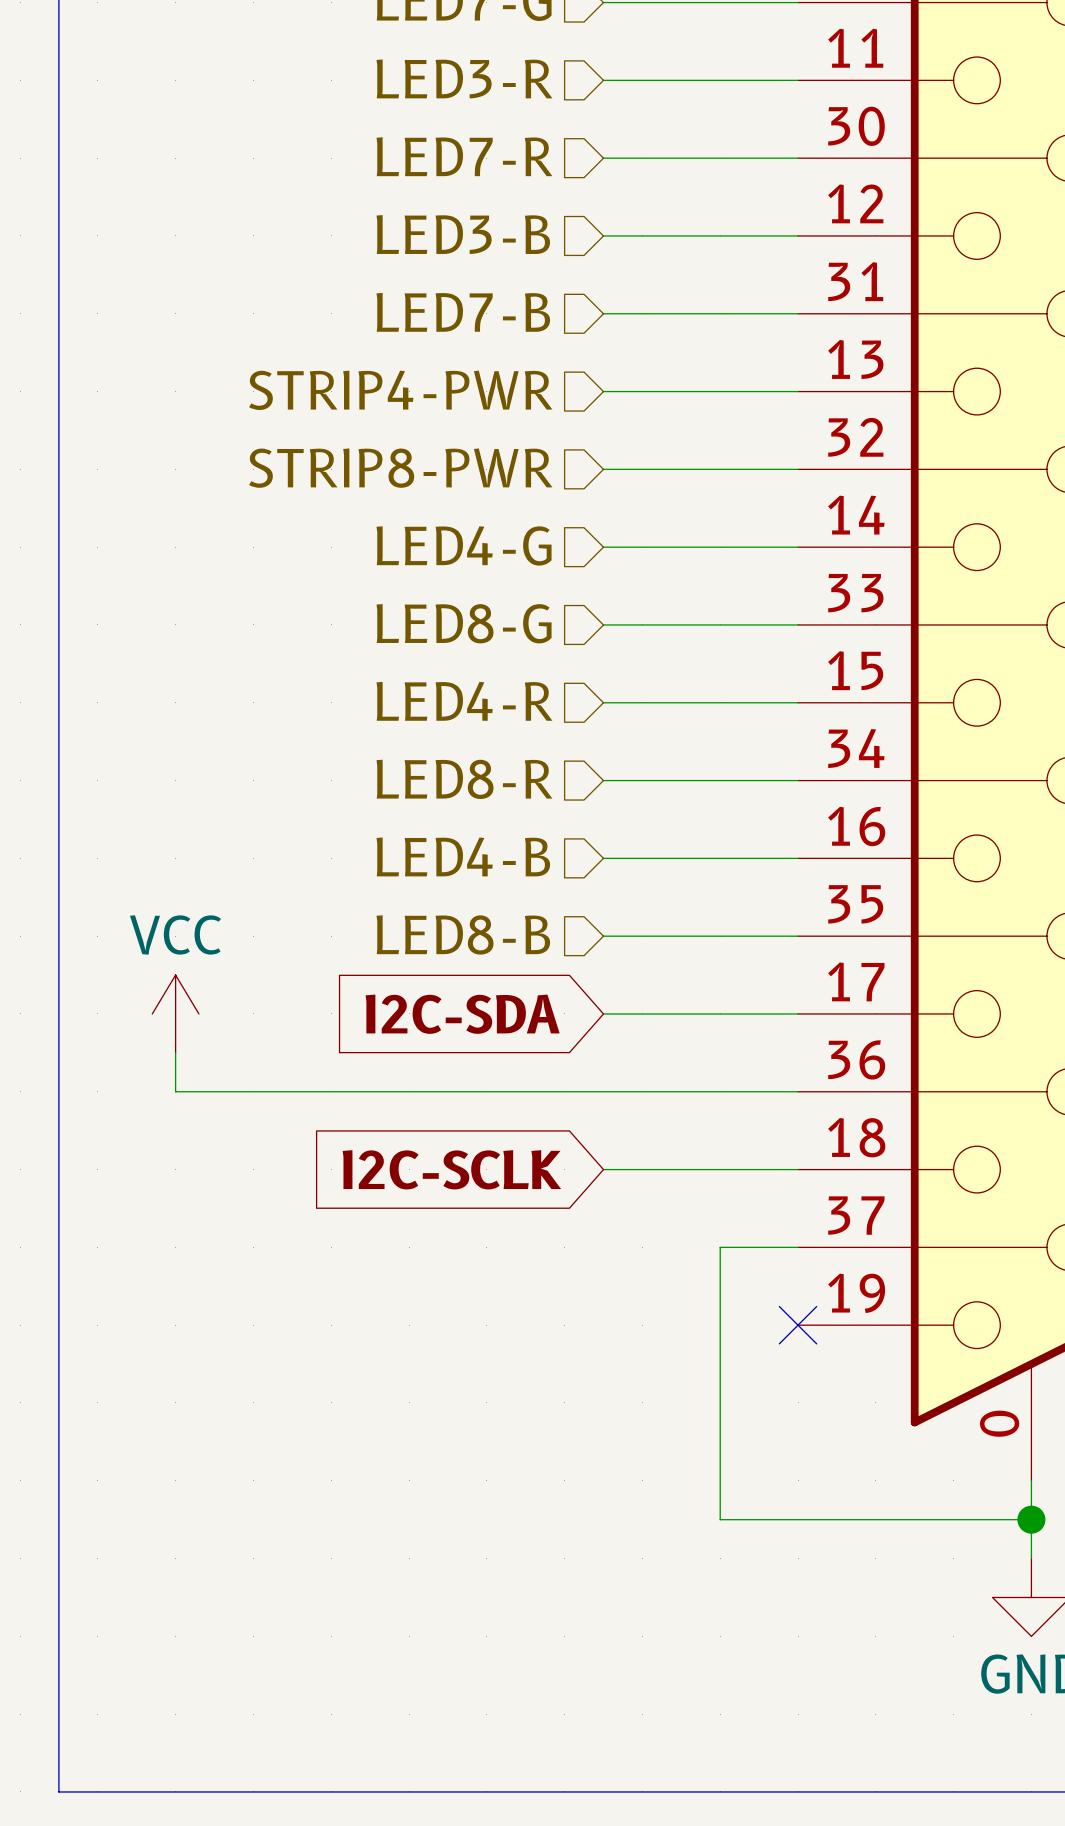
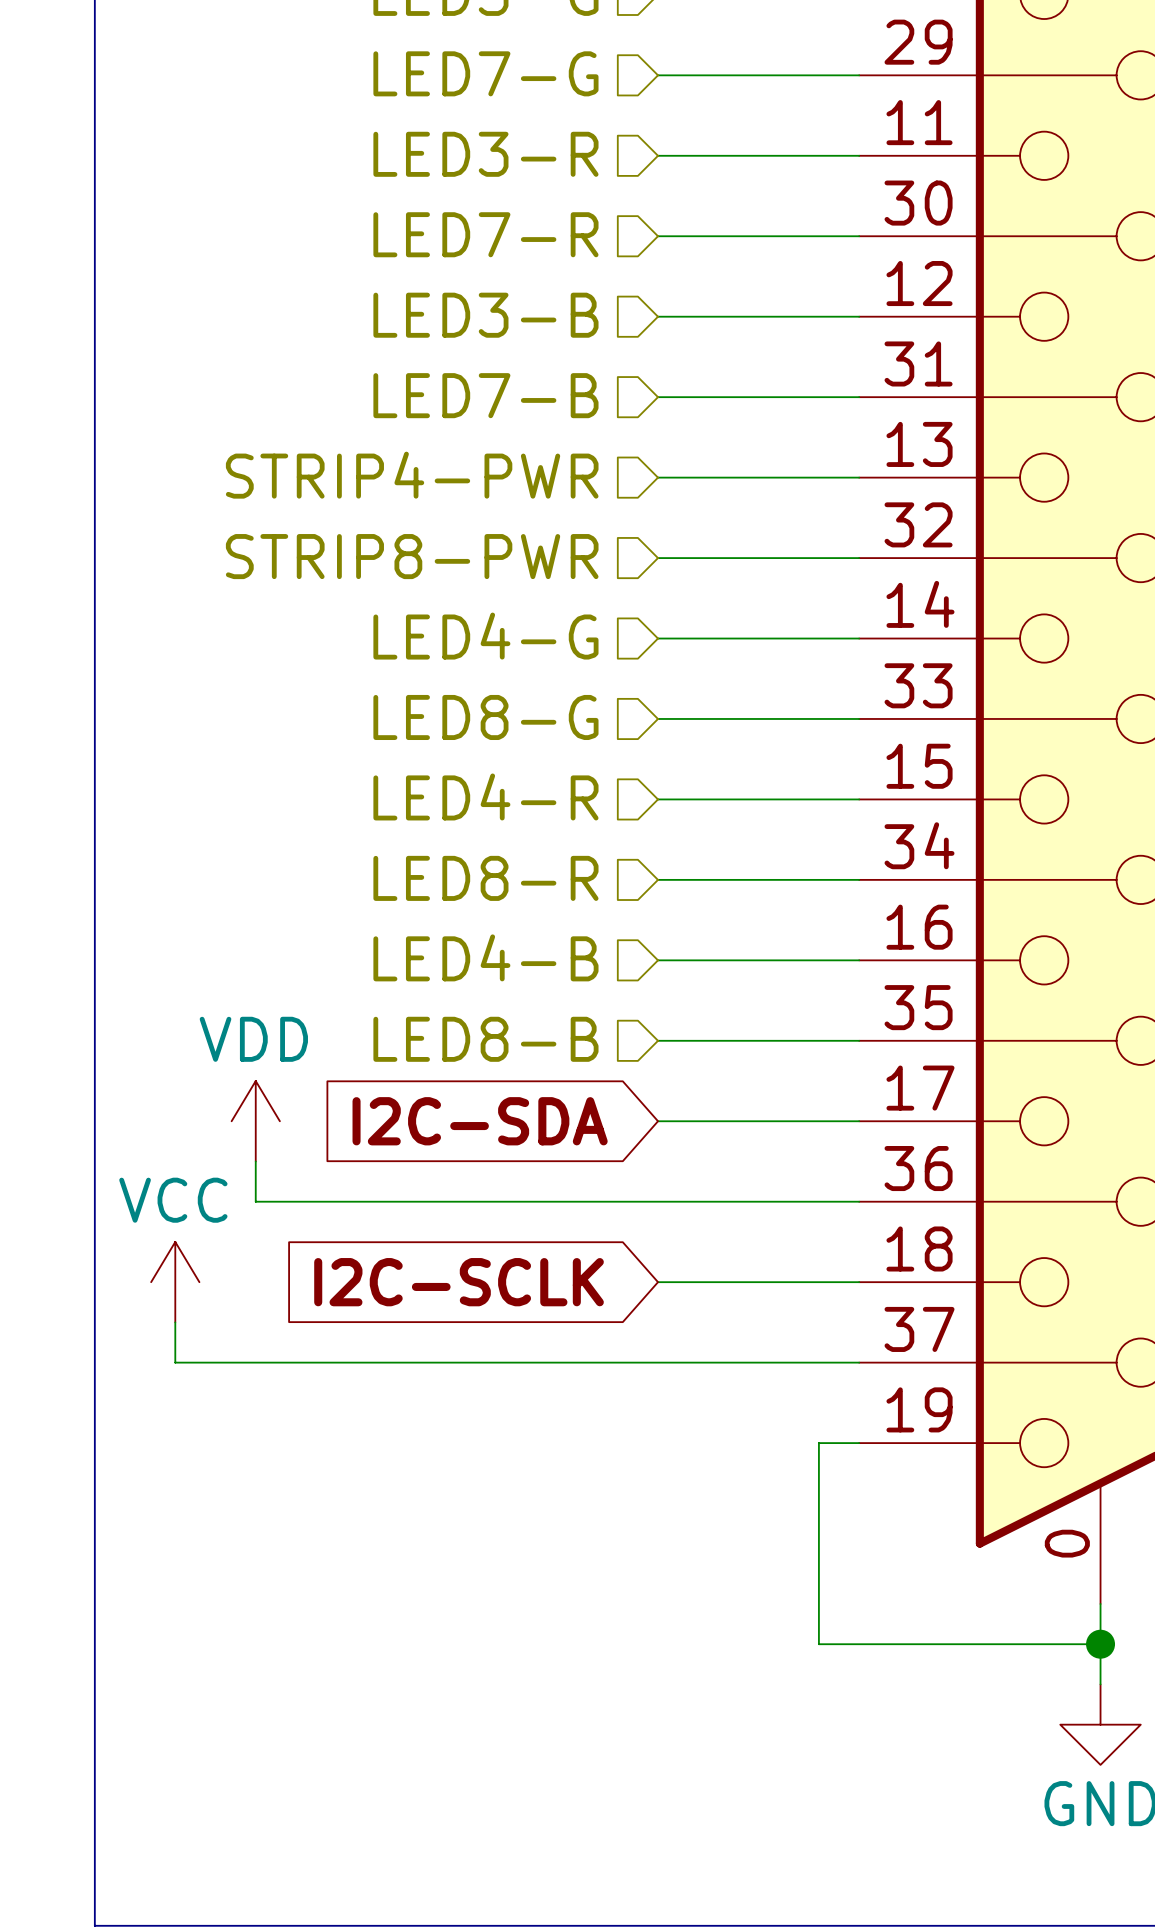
power symbol position: VCC (175, 1013) -> VCC (175, 1282)
power symbol: none -> VDD (255, 1121)
wire: (175, 1052) (175, 1091) (214, 1091) -> (255, 1161) (255, 1201)
wire: none -> (175, 1322) (175, 1362) (778, 1362)
wire: (720, 1247) (720, 1519) (759, 1519) -> (859, 1443) (818, 1443) (818, 1644)
no-connect mark: (798, 1325) -> none

